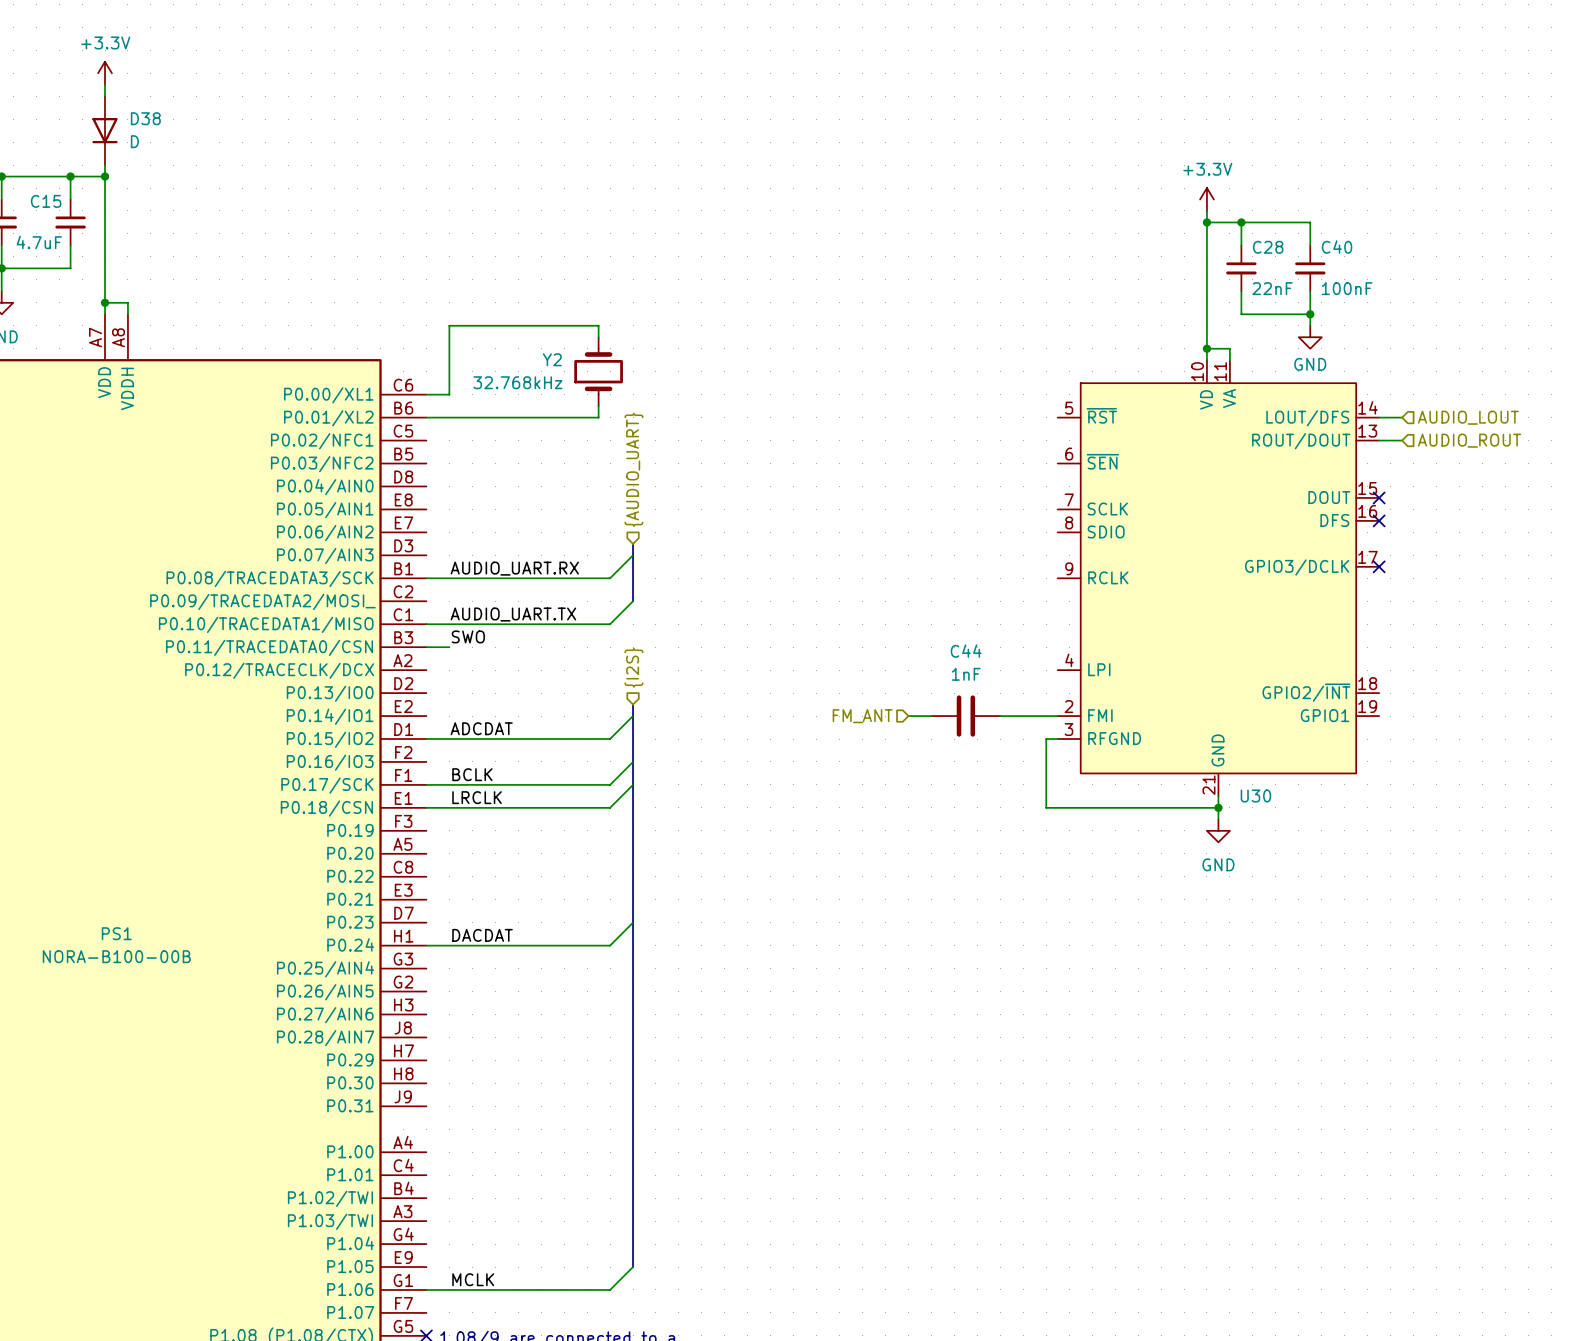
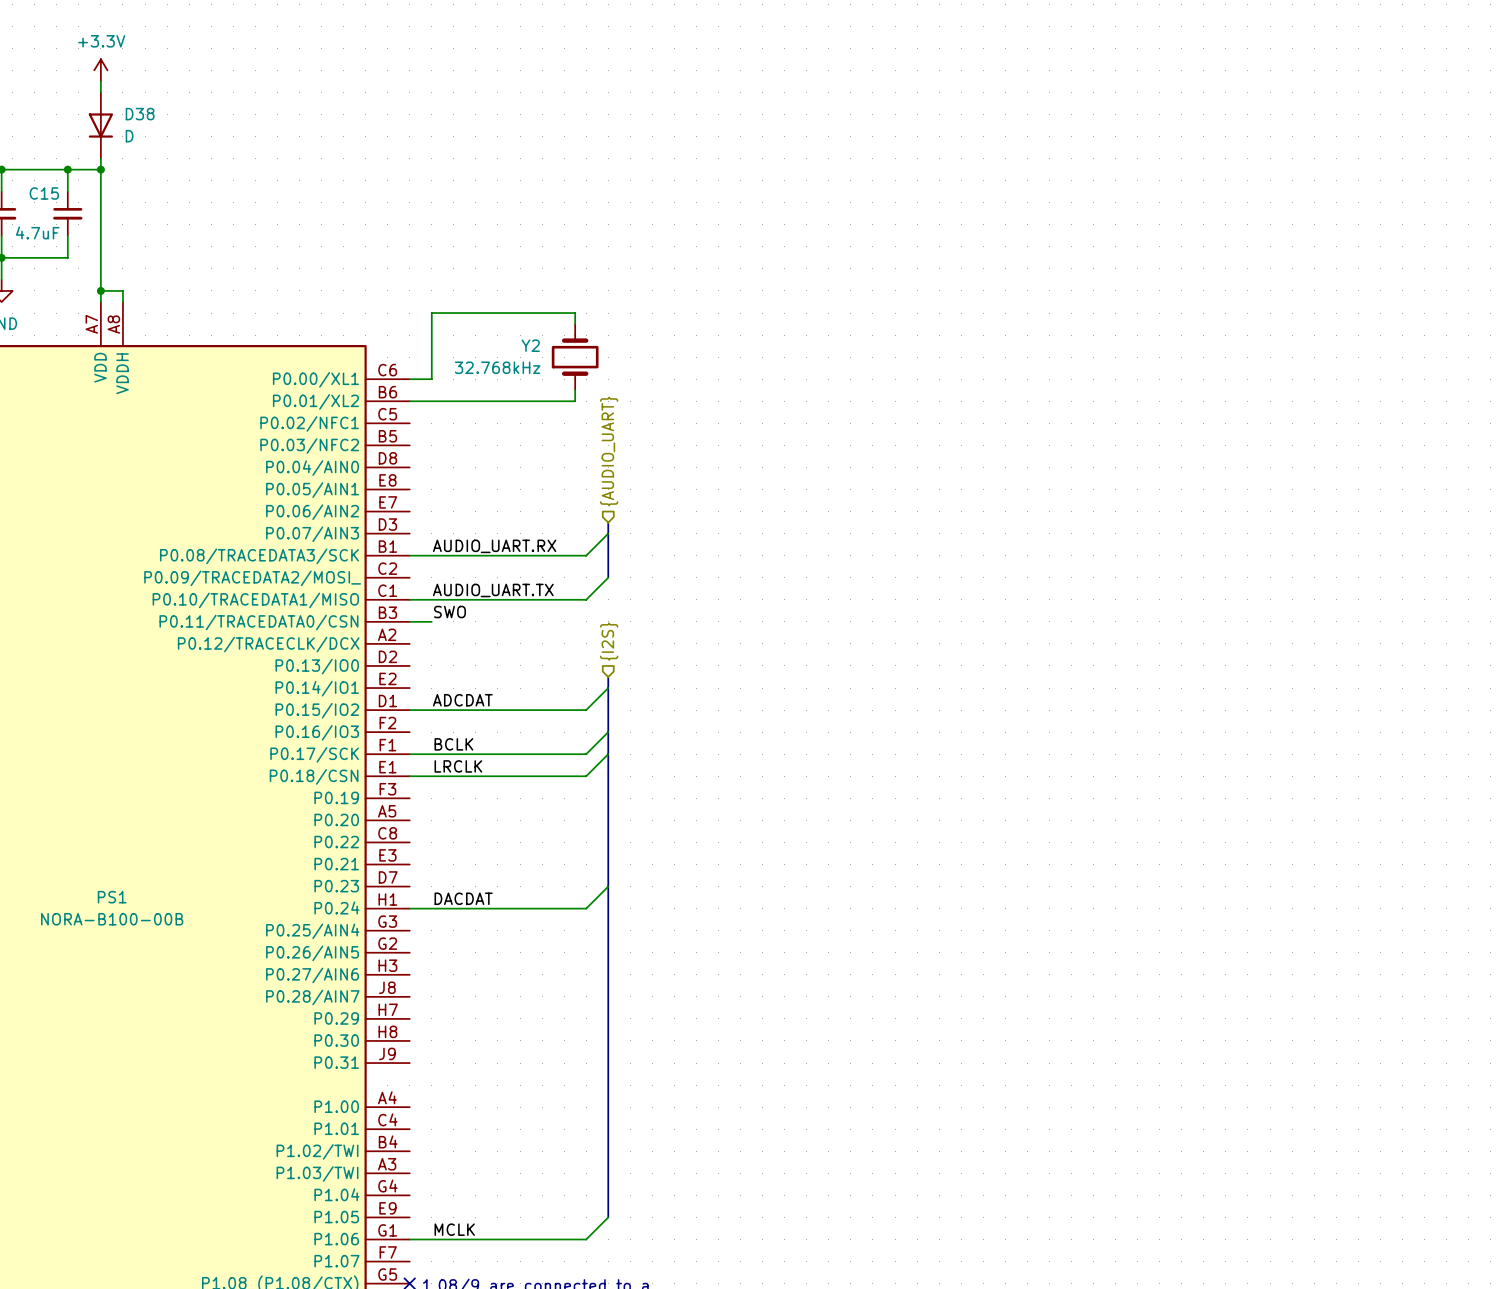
power symbol: +3.3V (1206, 199) -> none
wire: (1206, 210) (1206, 360) -> none
wire: (1206, 222) (1310, 222) (1310, 245) -> none
junction: (1206, 222) -> none
wire: (1241, 222) (1241, 245) -> none
junction: (1241, 222) -> none
C28: 22nF (1241, 268) -> none
C40: 100nF (1310, 268) -> none
wire: (1241, 291) (1241, 314) (1310, 314) -> none
wire: (1310, 291) (1310, 325) -> none
junction: (1310, 314) -> none
power symbol: GND (1310, 337) -> none
wire: (1206, 348) (1229, 348) (1229, 360) -> none
junction: (1206, 348) -> none
wire: (1379, 417) (1402, 417) -> none
hierarchical label: AUDIO_LOUT (1468, 417) -> none
wire: (1379, 440) (1402, 440) -> none
hierarchical label: AUDIO_ROUT (1469, 440) -> none
no-connect mark: (1379, 497) -> none
no-connect mark: (1379, 520) -> none
no-connect mark: (1379, 566) -> none
U30: (1218, 578) -> none
hierarchical label: FM_ANT (862, 716) -> none
wire: (908, 716) (931, 716) -> none
C44: 1nF (965, 716) -> none
wire: (1000, 716) (1057, 716) -> none
wire: (1057, 739) (1046, 739) (1046, 807) (1218, 807) -> none
wire: (1218, 796) (1218, 819) -> none
junction: (1218, 807) -> none
power symbol: GND (1218, 830) -> none

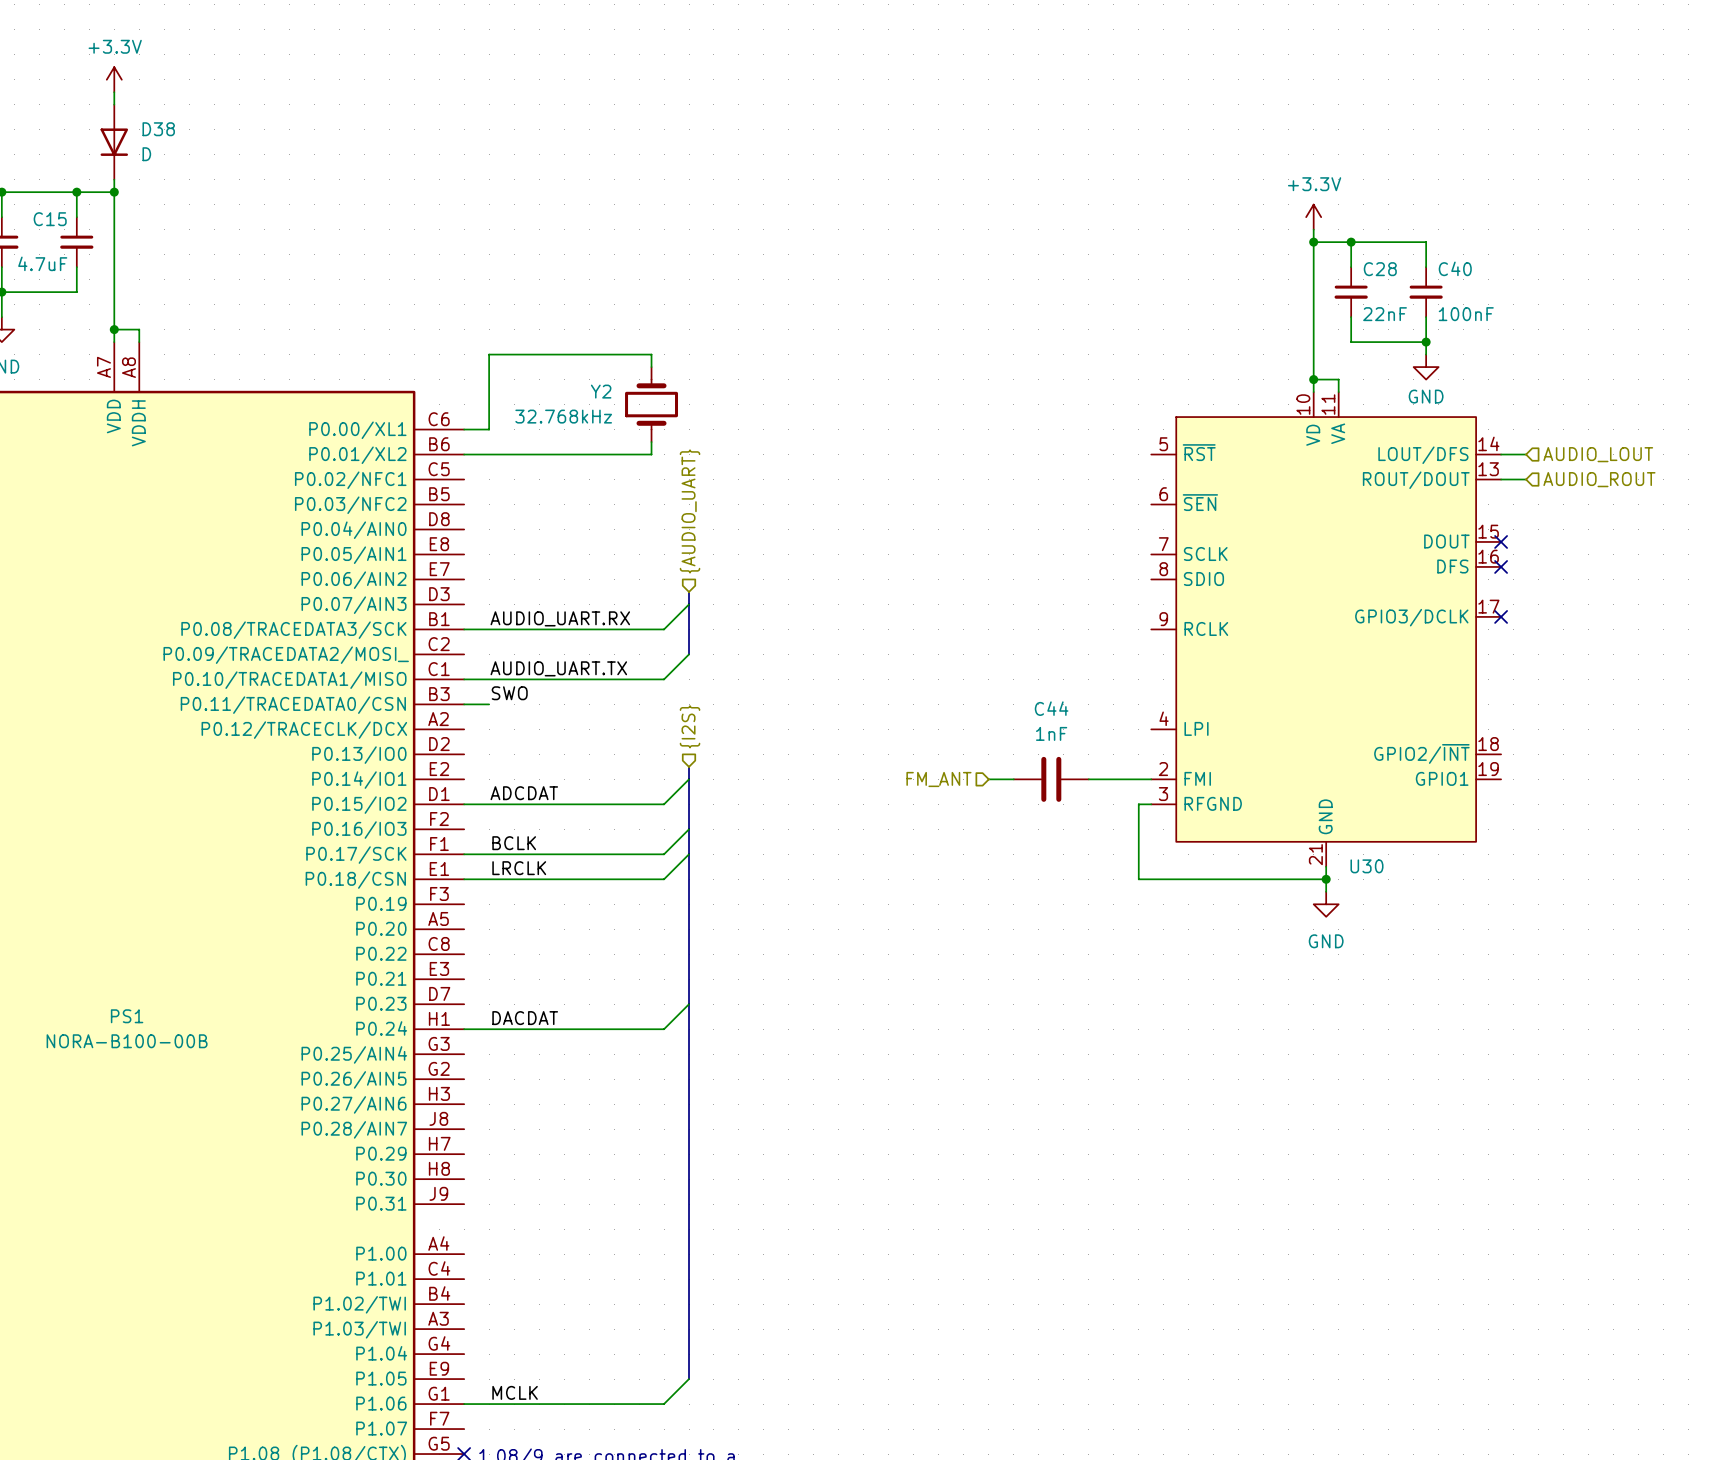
power symbol: none -> +3.3V (1313, 217)
wire: none -> (1313, 229) (1313, 392)
wire: none -> (1313, 242) (1426, 242) (1426, 267)
junction: none -> (1313, 242)
wire: none -> (1351, 242) (1351, 267)
junction: none -> (1351, 242)
C28: none -> 22nF (1351, 292)
C40: none -> 100nF (1426, 292)
wire: none -> (1351, 317) (1351, 342) (1426, 342)
wire: none -> (1426, 317) (1426, 354)
junction: none -> (1426, 342)
power symbol: none -> GND (1426, 367)
wire: none -> (1313, 379) (1338, 379) (1338, 392)
junction: none -> (1313, 379)
wire: none -> (1501, 454) (1526, 454)
hierarchical label: none -> AUDIO_LOUT (1598, 454)
wire: none -> (1501, 479) (1526, 479)
hierarchical label: none -> AUDIO_ROUT (1599, 479)
no-connect mark: none -> (1501, 541)
no-connect mark: none -> (1501, 566)
no-connect mark: none -> (1501, 616)
U30: none -> (1326, 629)
hierarchical label: none -> FM_ANT (938, 779)
wire: none -> (988, 779) (1013, 779)
C44: none -> 1nF (1051, 779)
wire: none -> (1088, 779) (1151, 779)
wire: none -> (1151, 804) (1138, 804) (1138, 879) (1326, 879)
wire: none -> (1326, 866) (1326, 891)
junction: none -> (1326, 879)
power symbol: none -> GND (1326, 904)

